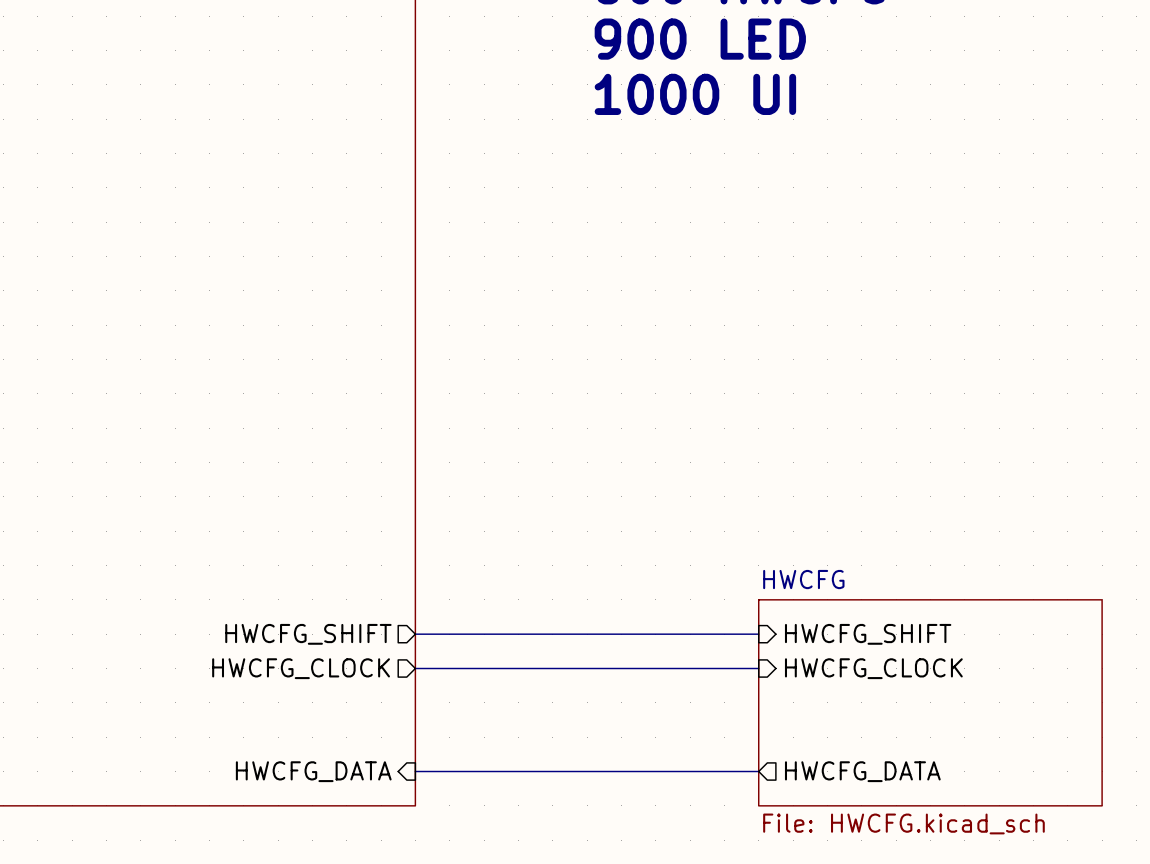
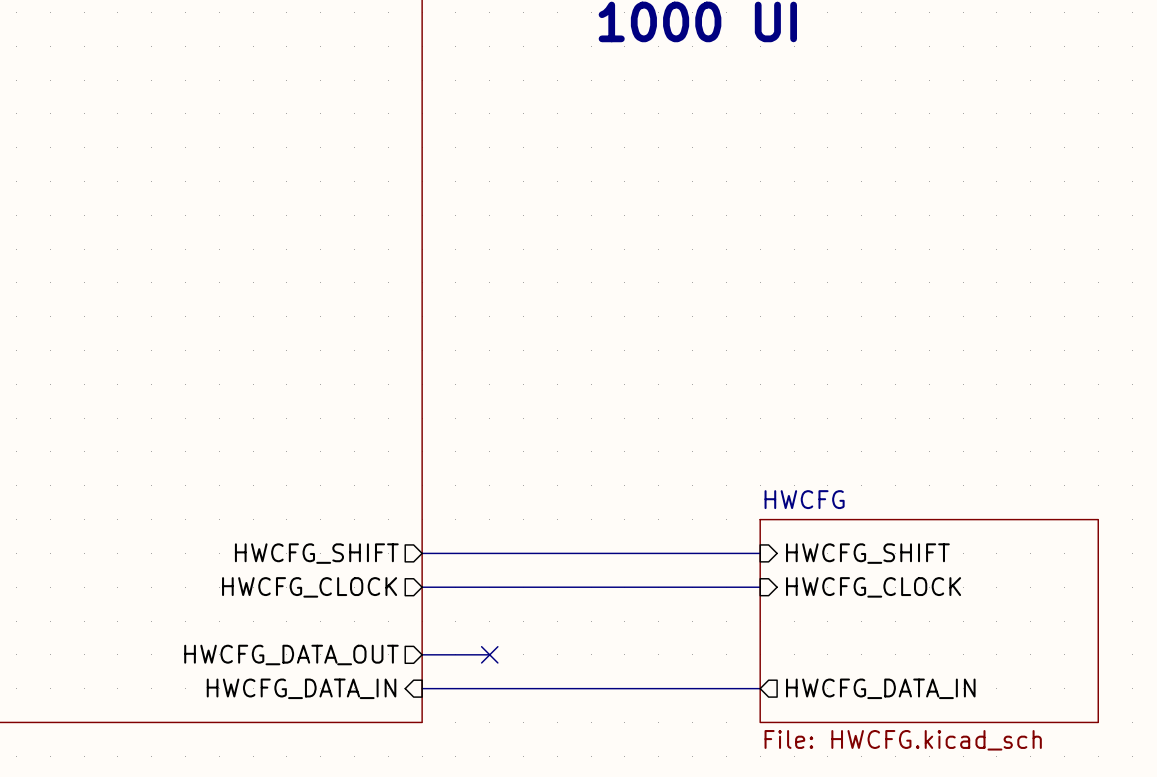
sheet pin: none -> HWCFG_DATA_OUT (291, 655)
wire: none -> (422, 654) (489, 654)
no-connect mark: none -> (489, 654)
sheet pin: HWCFG_DATA (313, 771) -> HWCFG_DATA_IN (301, 688)
sheet pin: HWCFG_DATA (862, 771) -> HWCFG_DATA_IN (880, 688)

